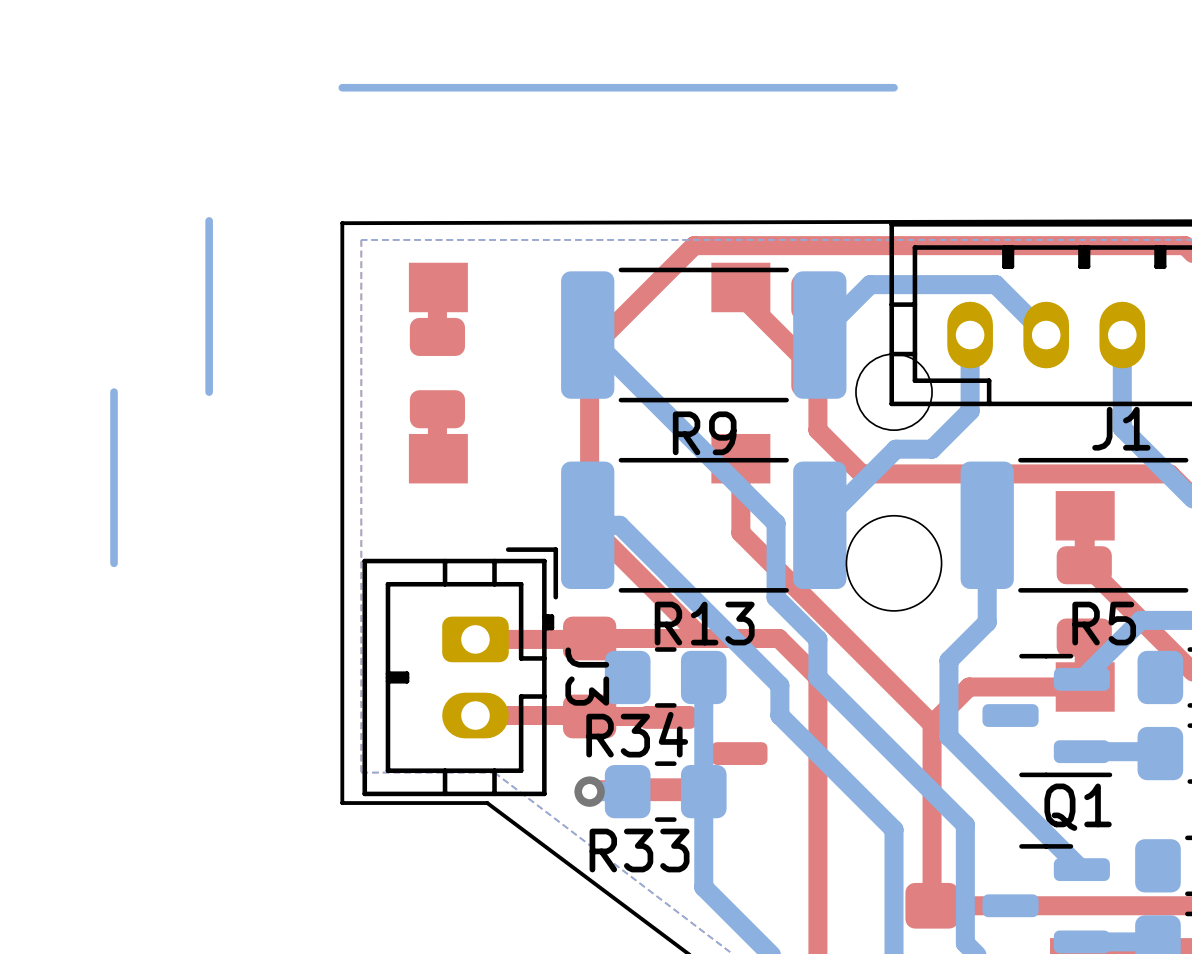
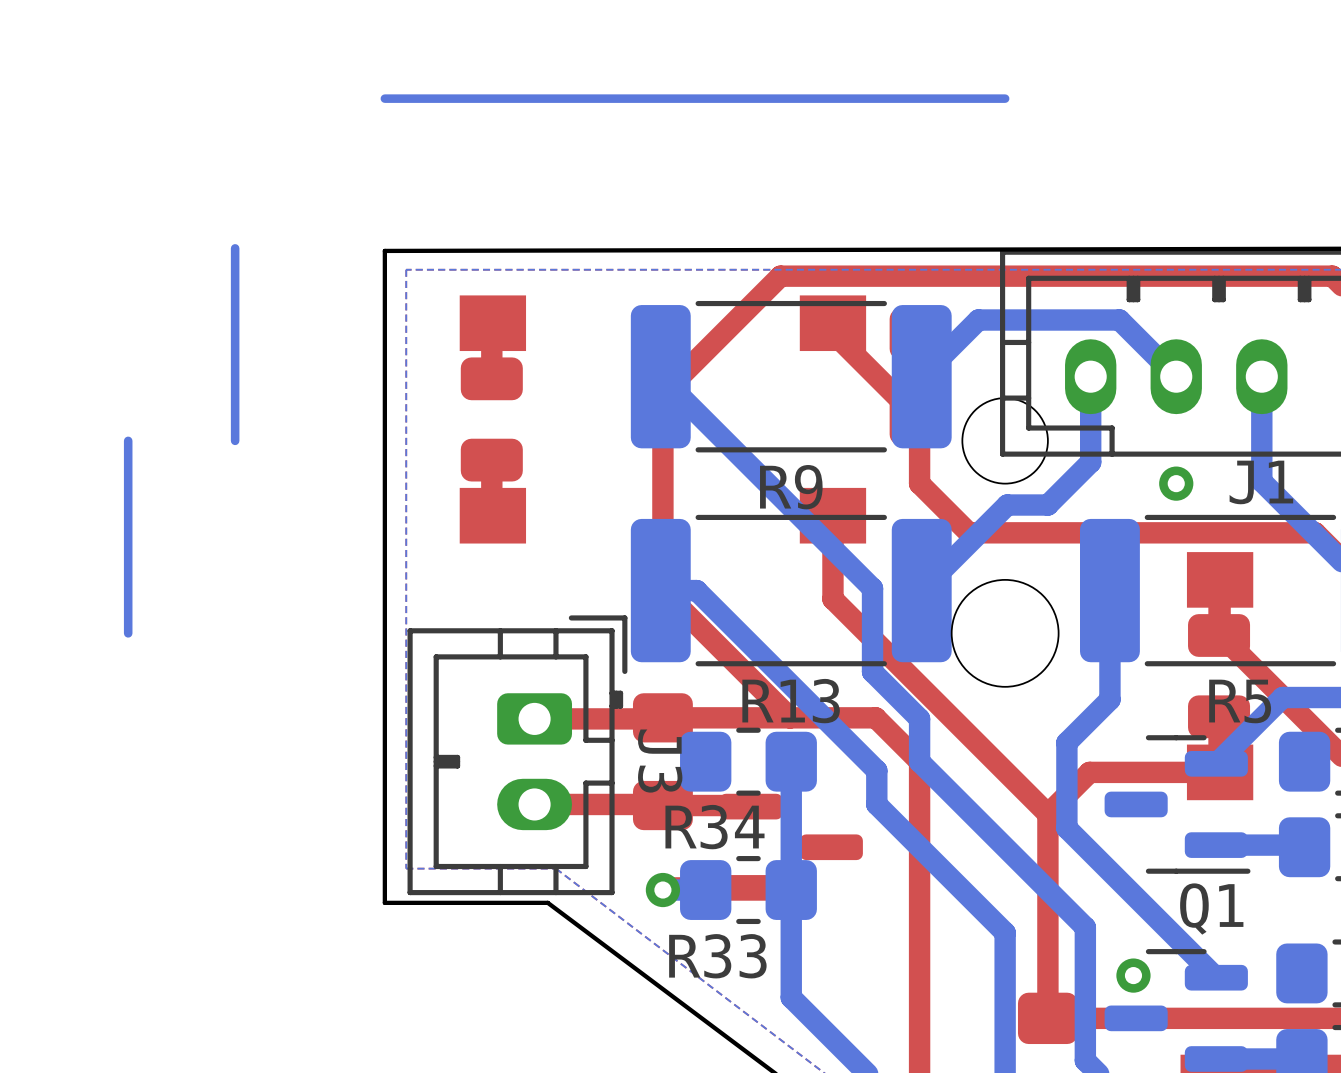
via: none -> (1176, 483)
via: none -> (1133, 975)

